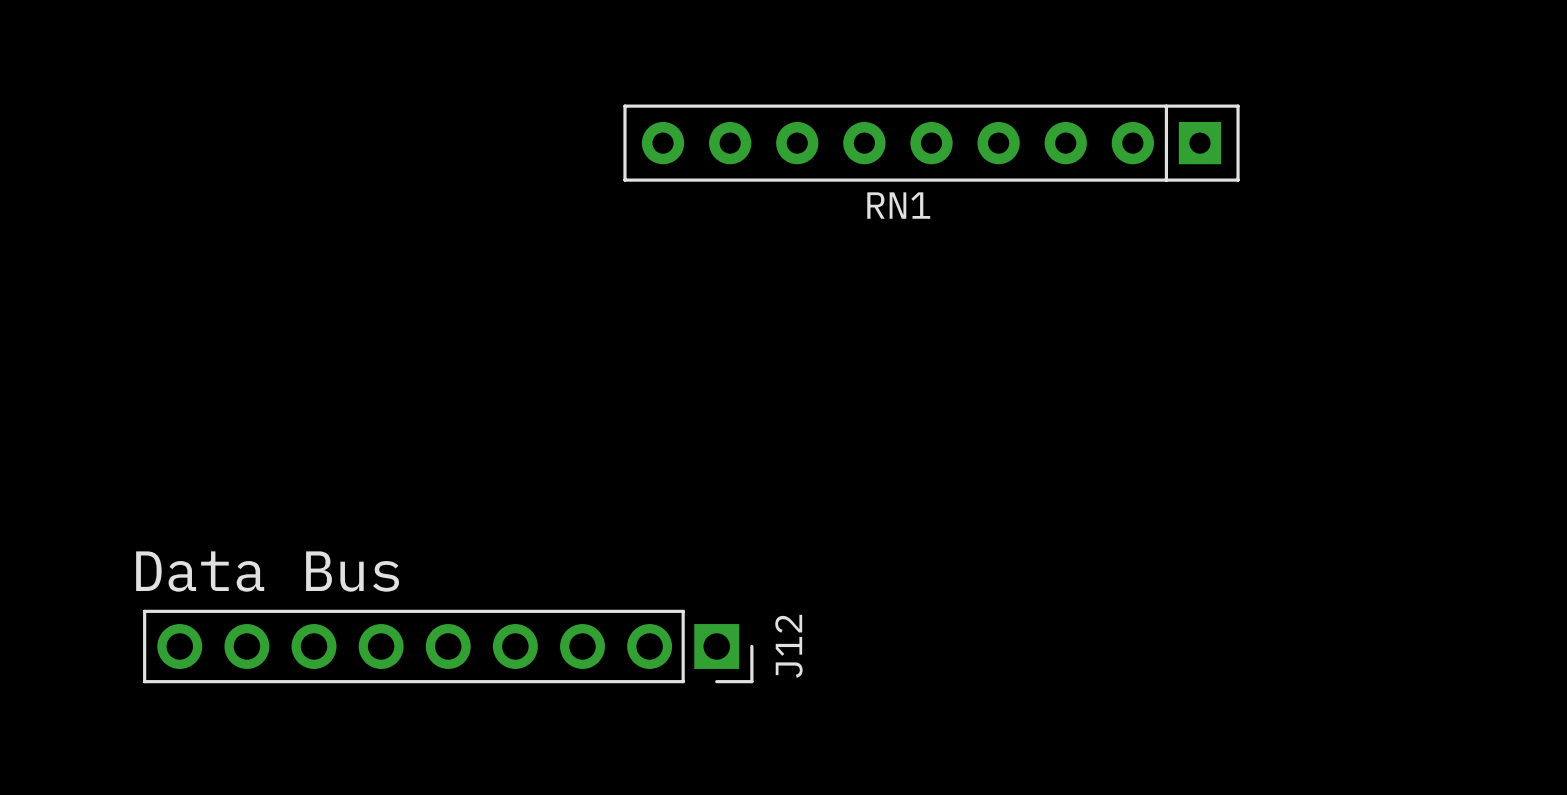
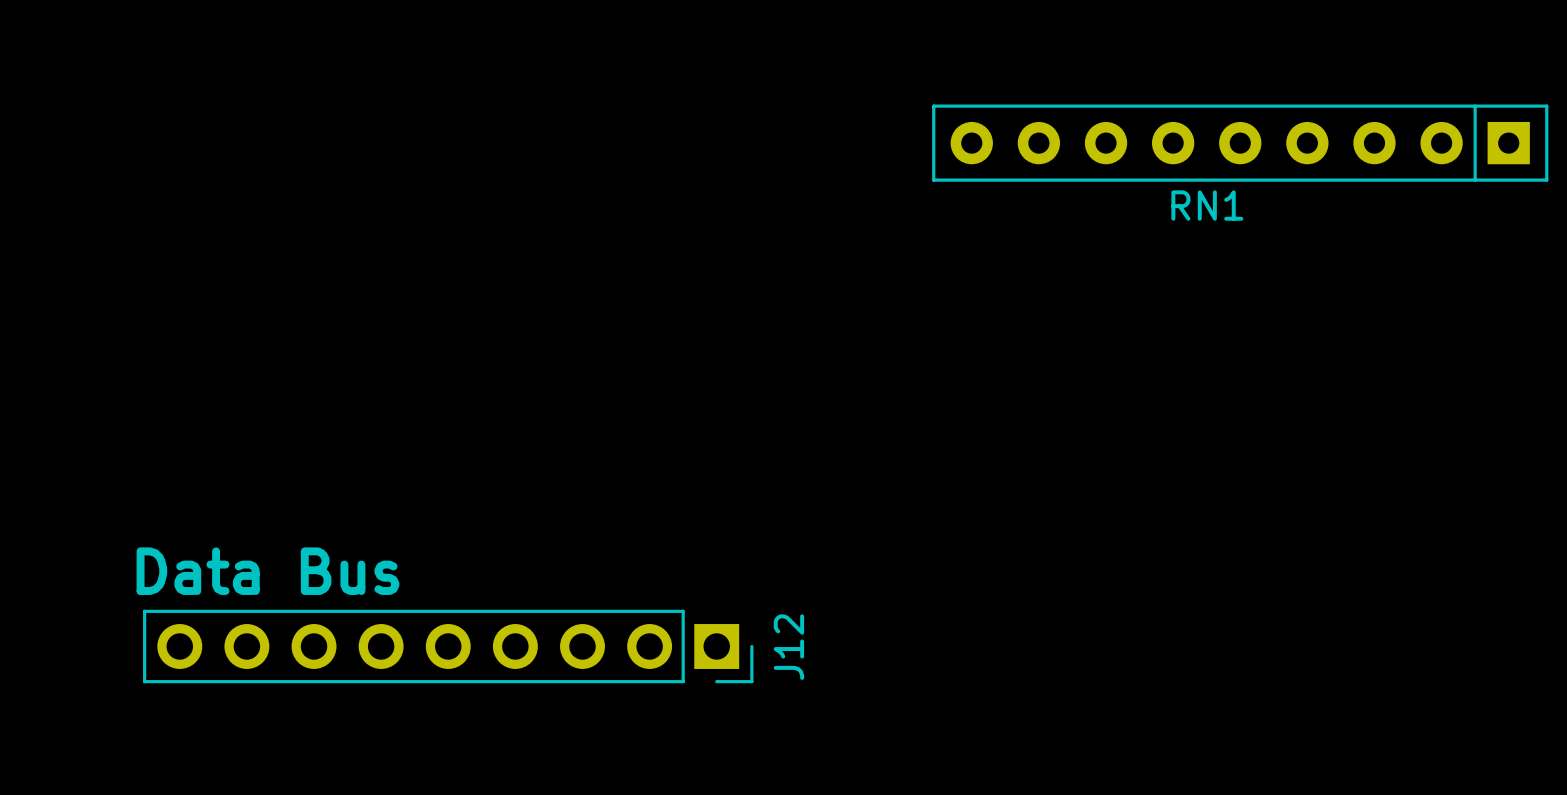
RN1 position: (931, 143) -> (1240, 143)

